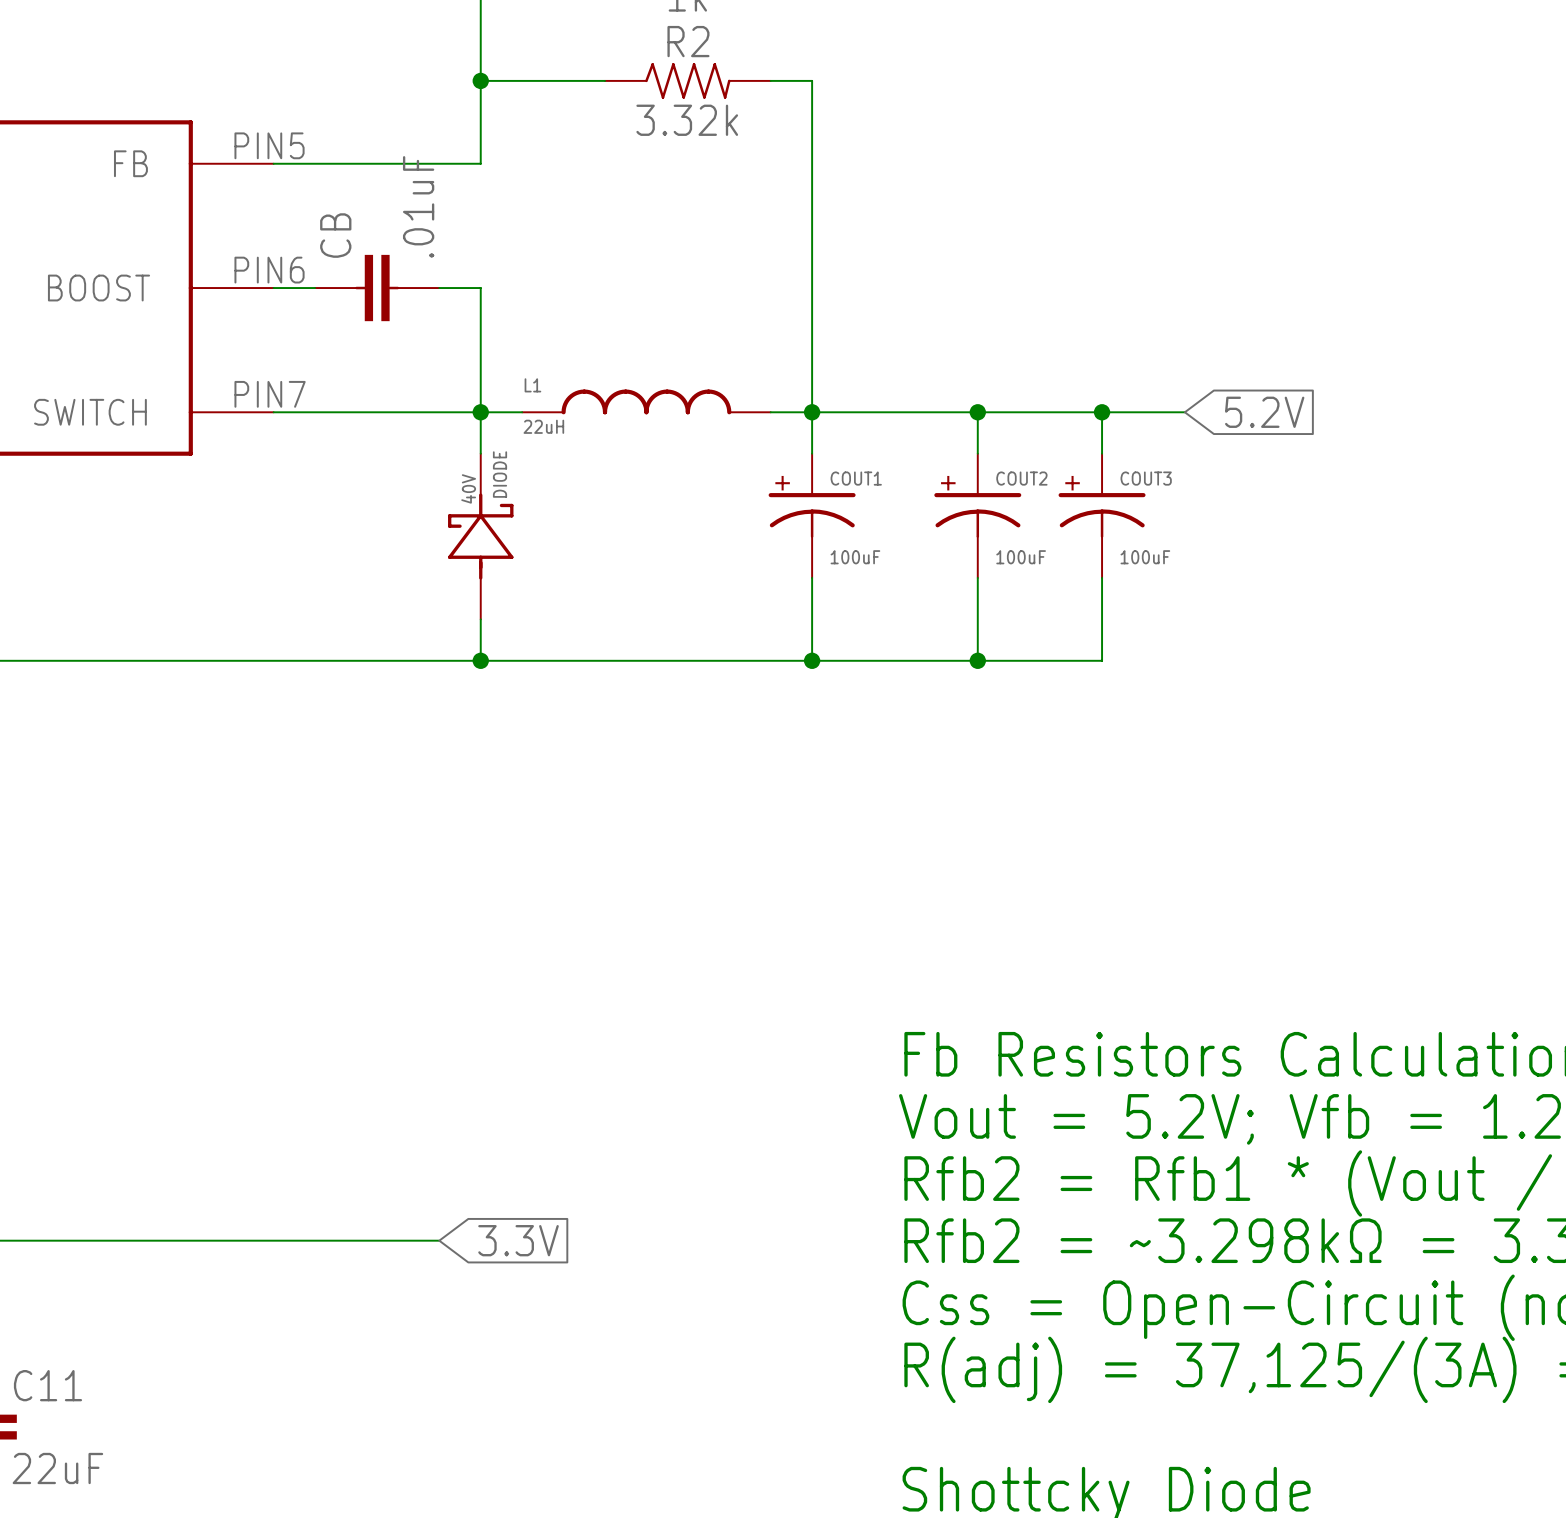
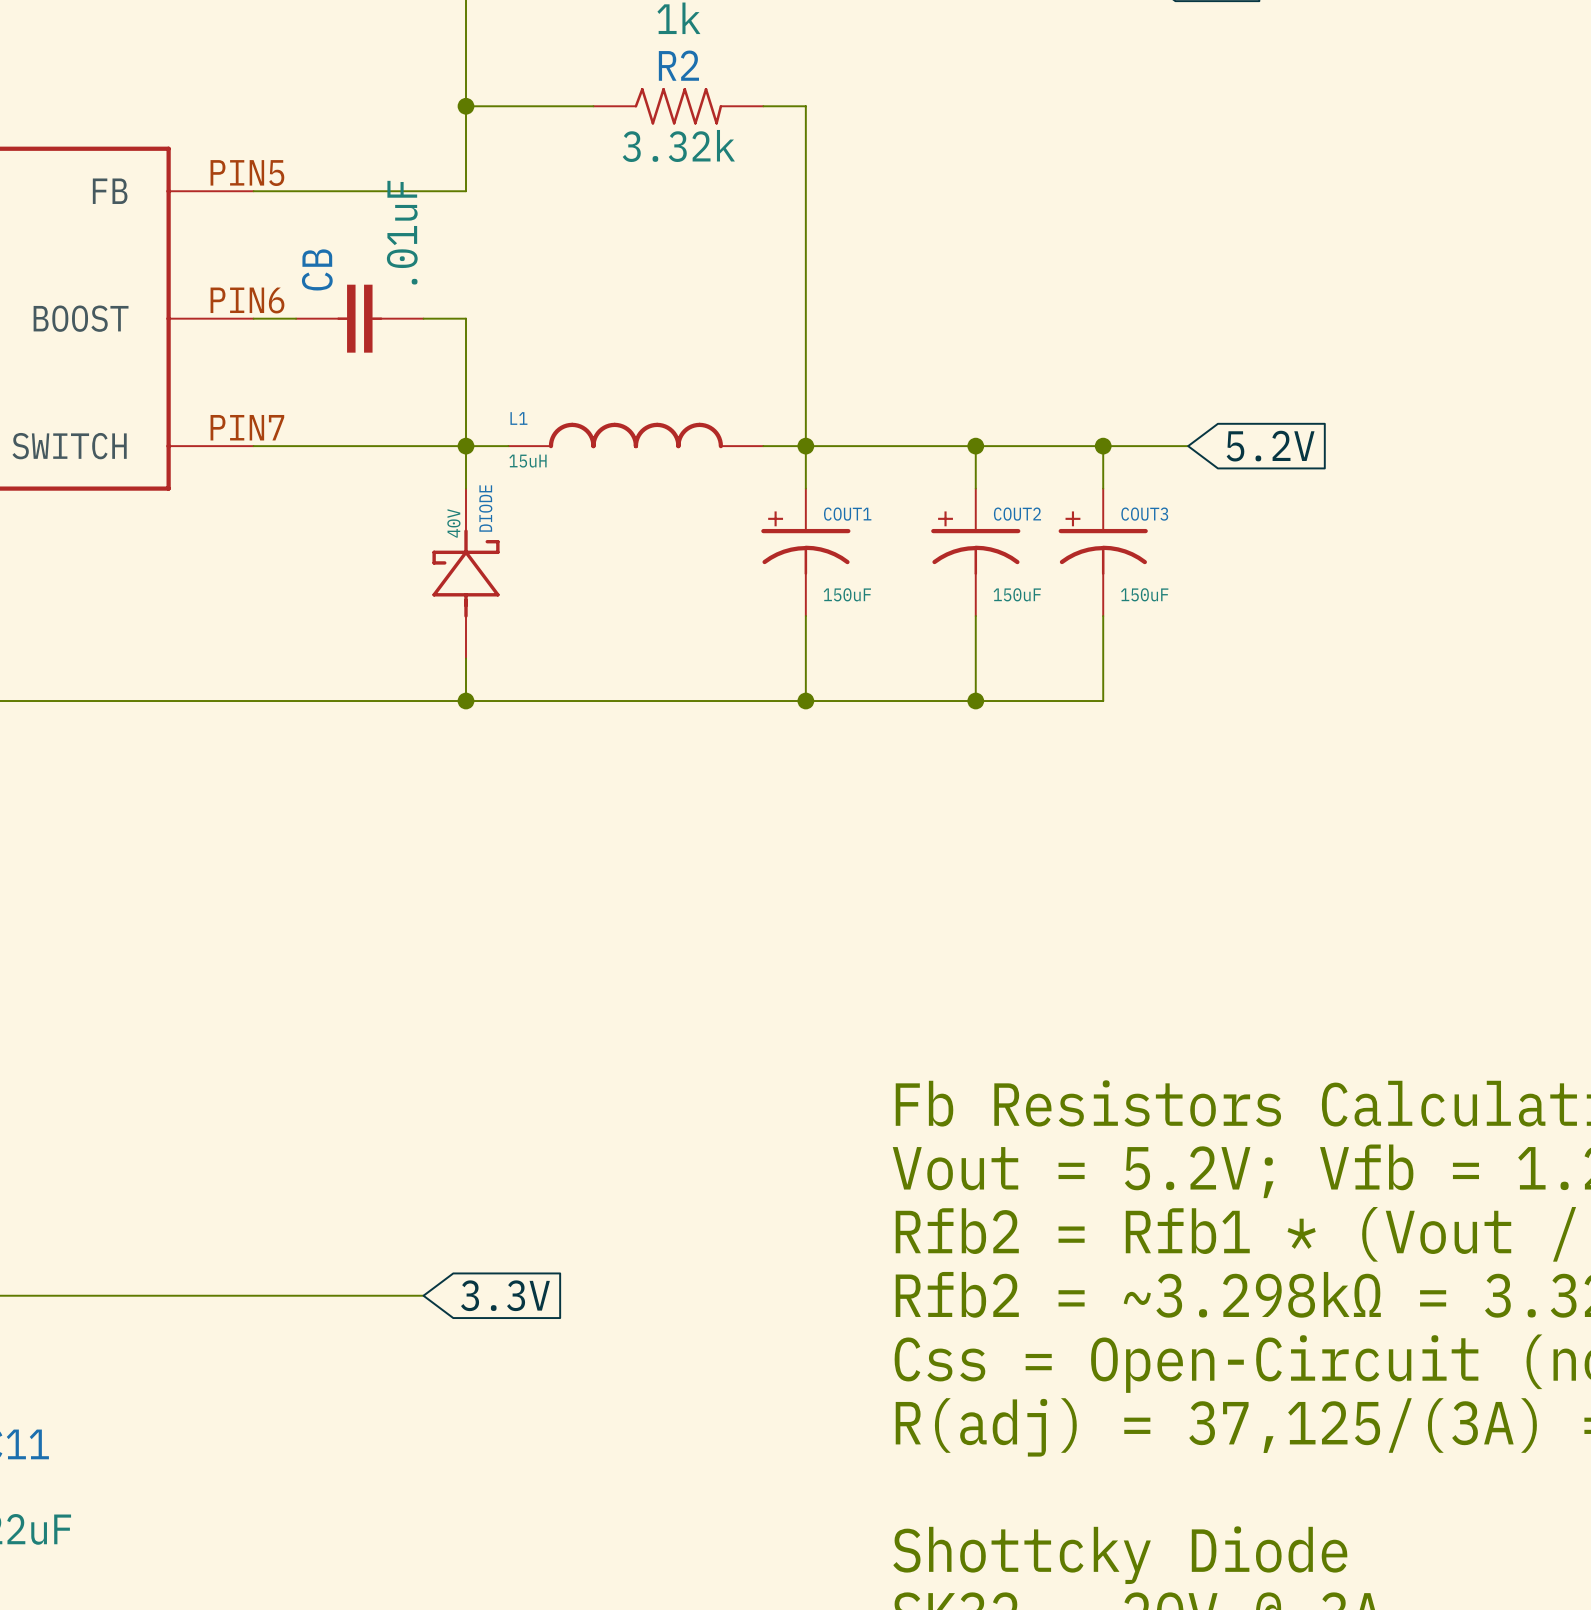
L1 value: 22uH (543, 426) -> 15uH (527, 461)
COUT1 value: 100uF (855, 557) -> 150uF (847, 594)
COUT2 value: 100uF (1021, 557) -> 150uF (1017, 594)
COUT3 value: 100uF (1145, 557) -> 150uF (1144, 594)

